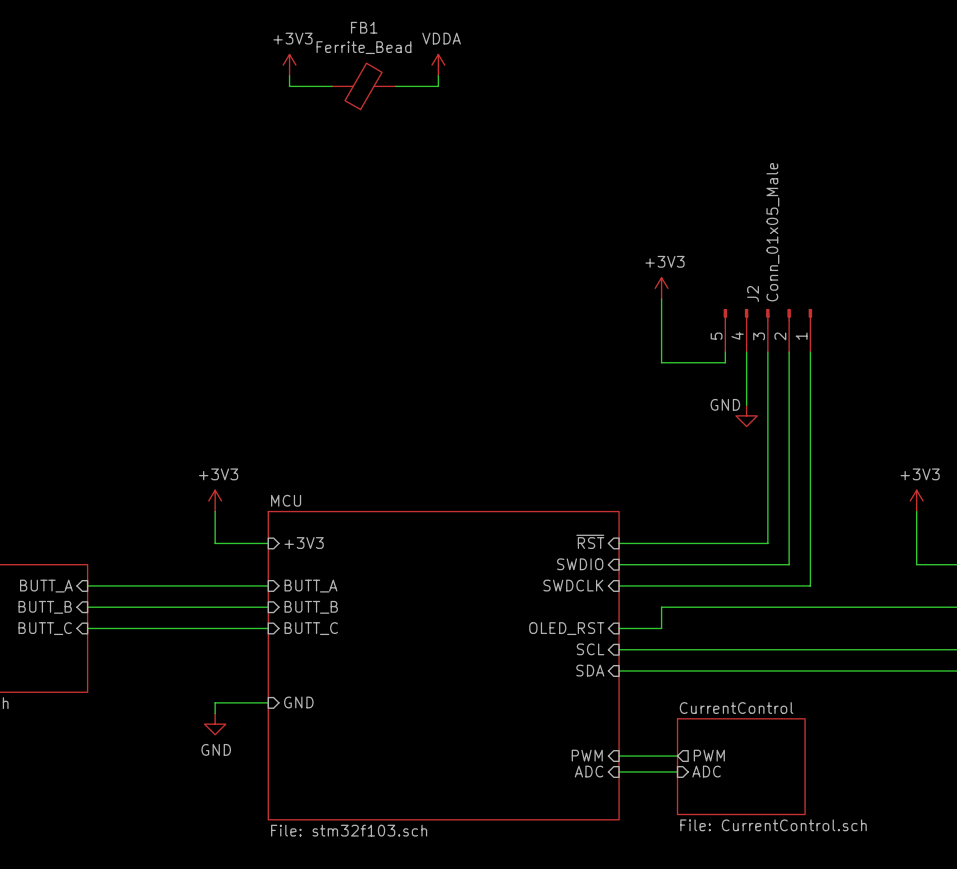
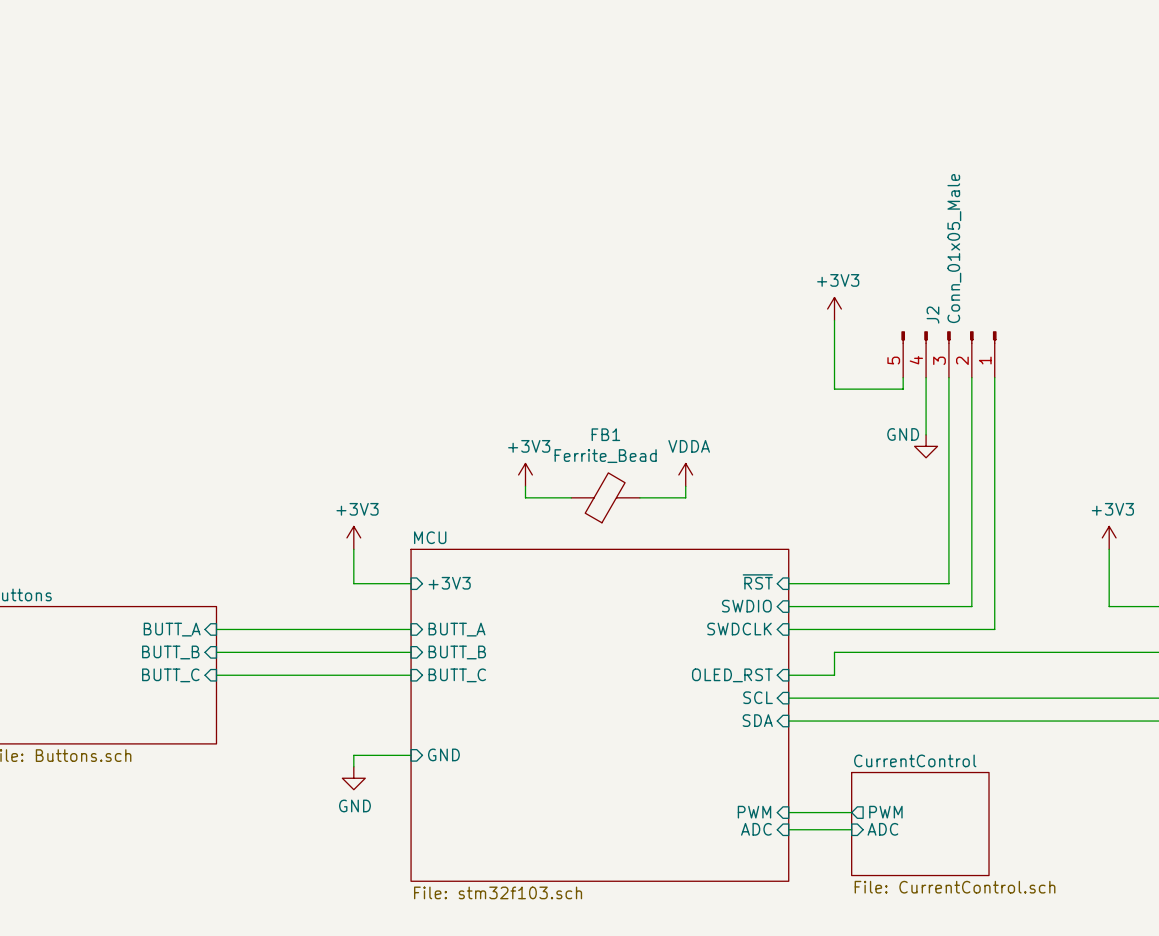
power symbol: +3V3 (289, 65) -> none
power symbol: VDDA (438, 65) -> none
wire: (289, 75) (289, 86) (332, 86) -> none
wire: (438, 75) (438, 86) (395, 86) -> none
FB1 position: (363, 86) -> (605, 497)
power symbol: none -> +3V3 (525, 474)
power symbol: none -> VDDA (685, 474)
wire: none -> (525, 486) (525, 497) (571, 497)
wire: none -> (685, 486) (685, 497) (639, 497)

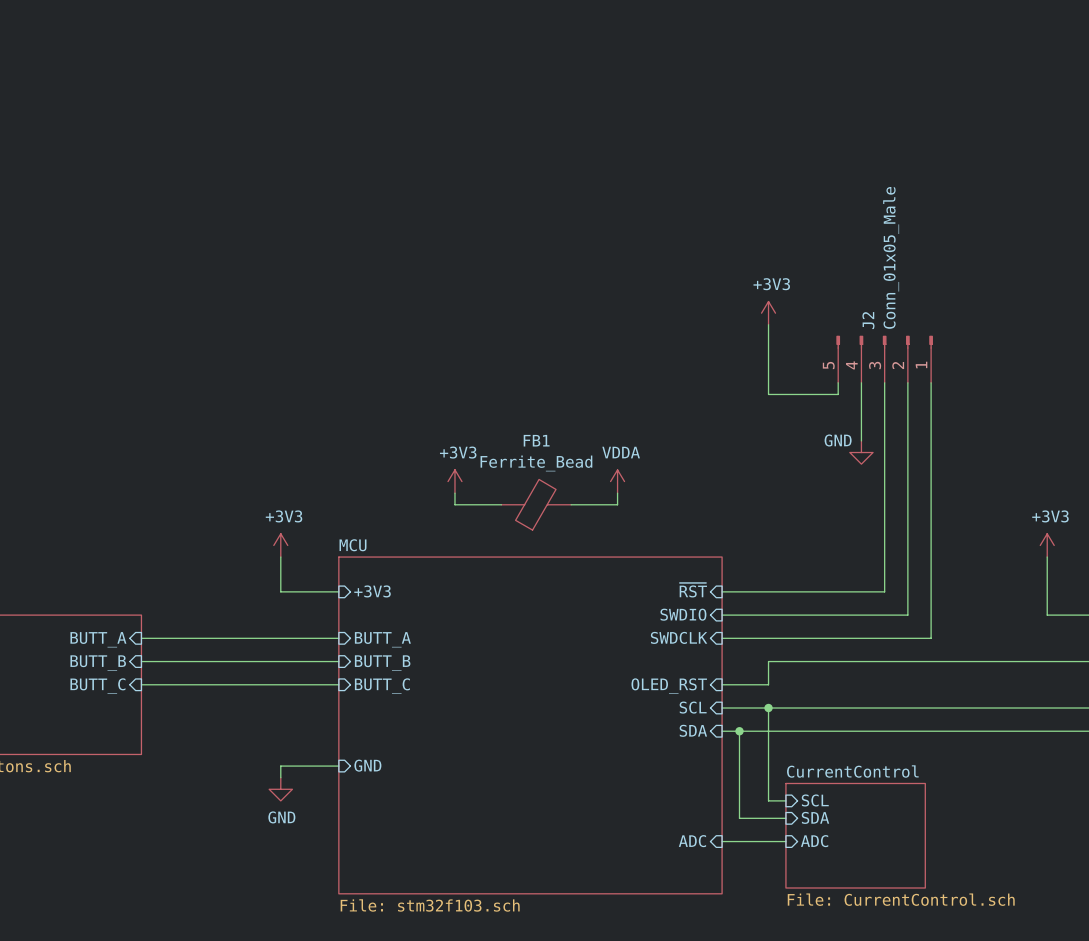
wire: none -> (768, 708) (768, 800) (785, 800)
junction: none -> (768, 708)
wire: none -> (739, 731) (739, 818) (785, 818)
junction: none -> (739, 731)
sheet pin: none -> SCL (815, 800)
sheet pin: PWM (754, 812) -> none
wire: (788, 812) (851, 812) -> none
sheet pin shape: output (885, 812) -> input (815, 817)
sheet pin: PWM (885, 812) -> SDA (815, 817)

